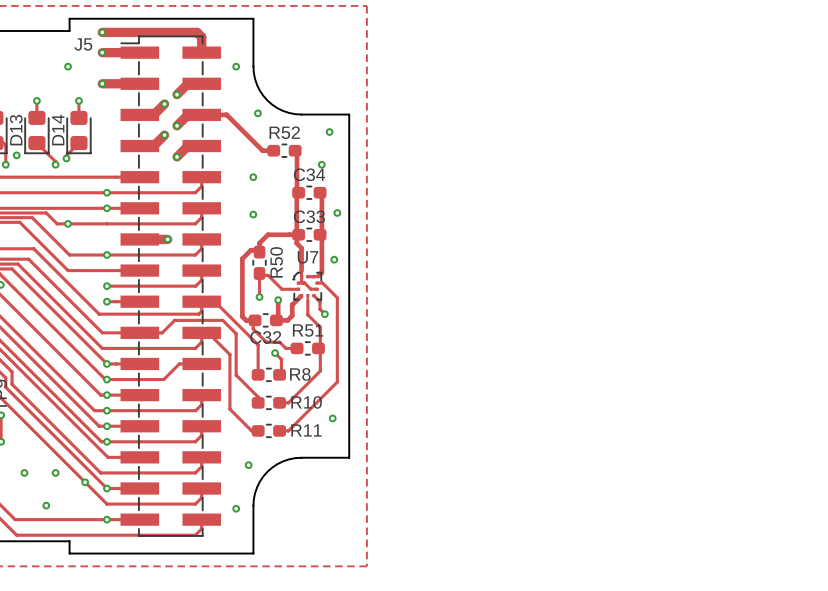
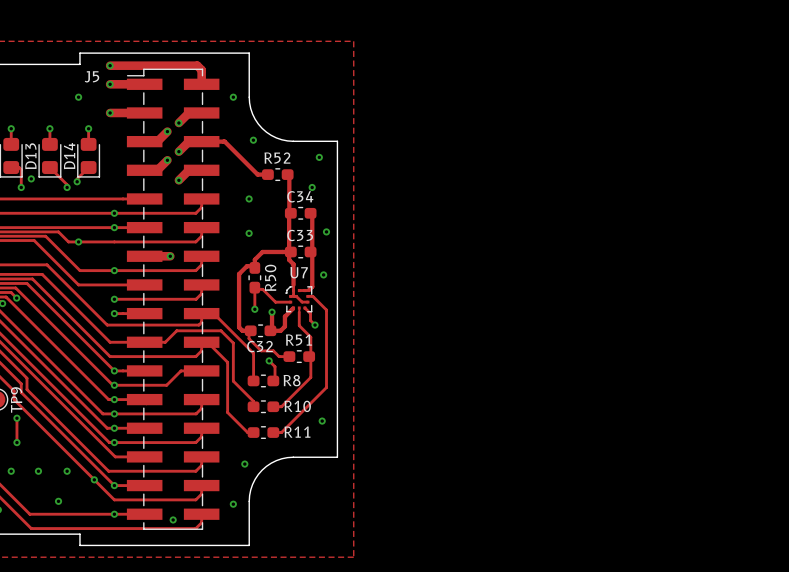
via: none -> (173, 519)

